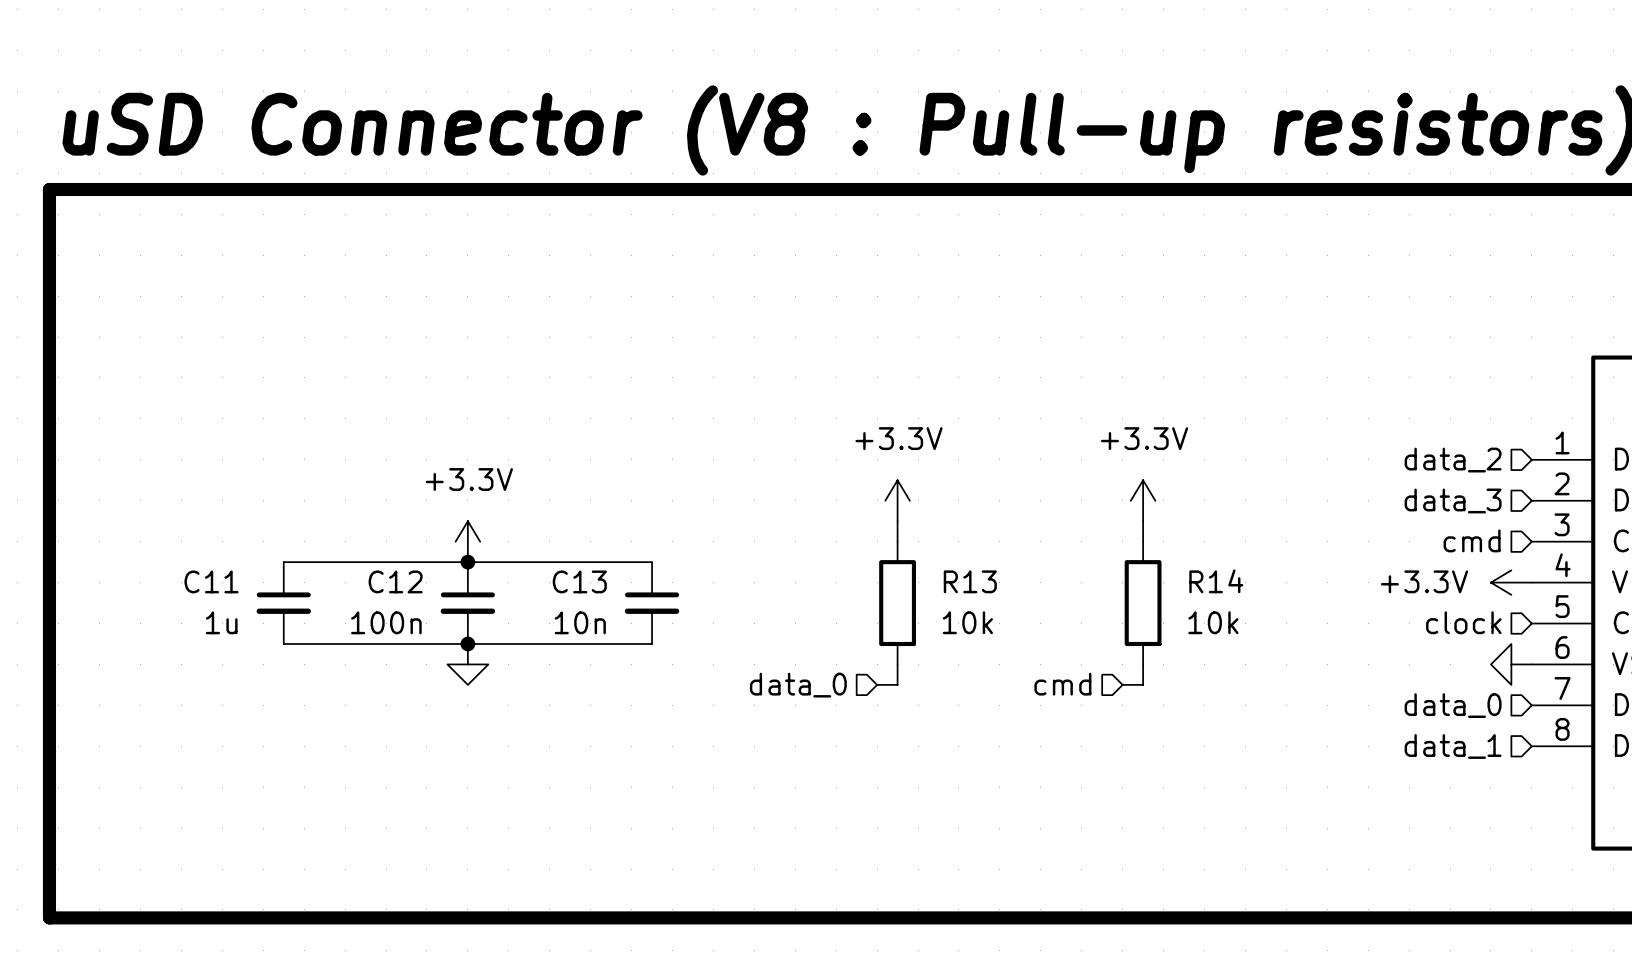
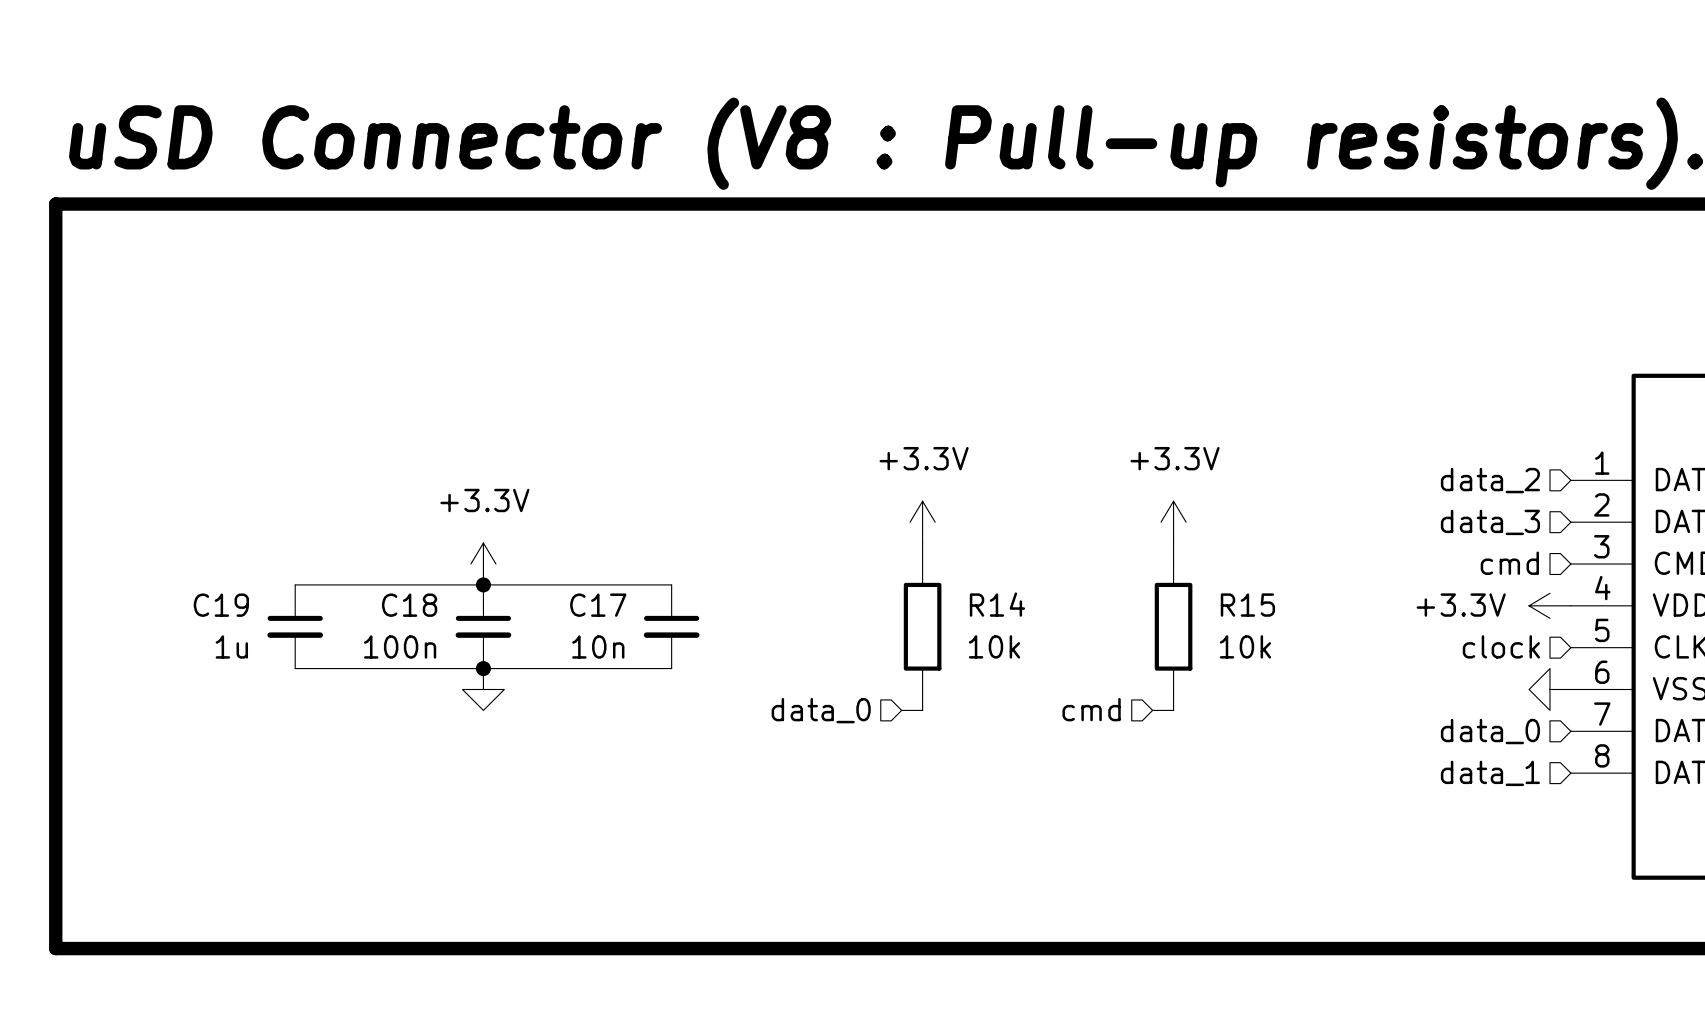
C11 name: C11 (211, 581) -> C19 (221, 605)
C12 name: C12 (395, 581) -> C18 (409, 605)
C13 name: C13 (579, 581) -> C17 (598, 605)
R13 name: R13 (970, 581) -> R14 (997, 604)
R14 name: R14 (1216, 581) -> R15 (1247, 605)

